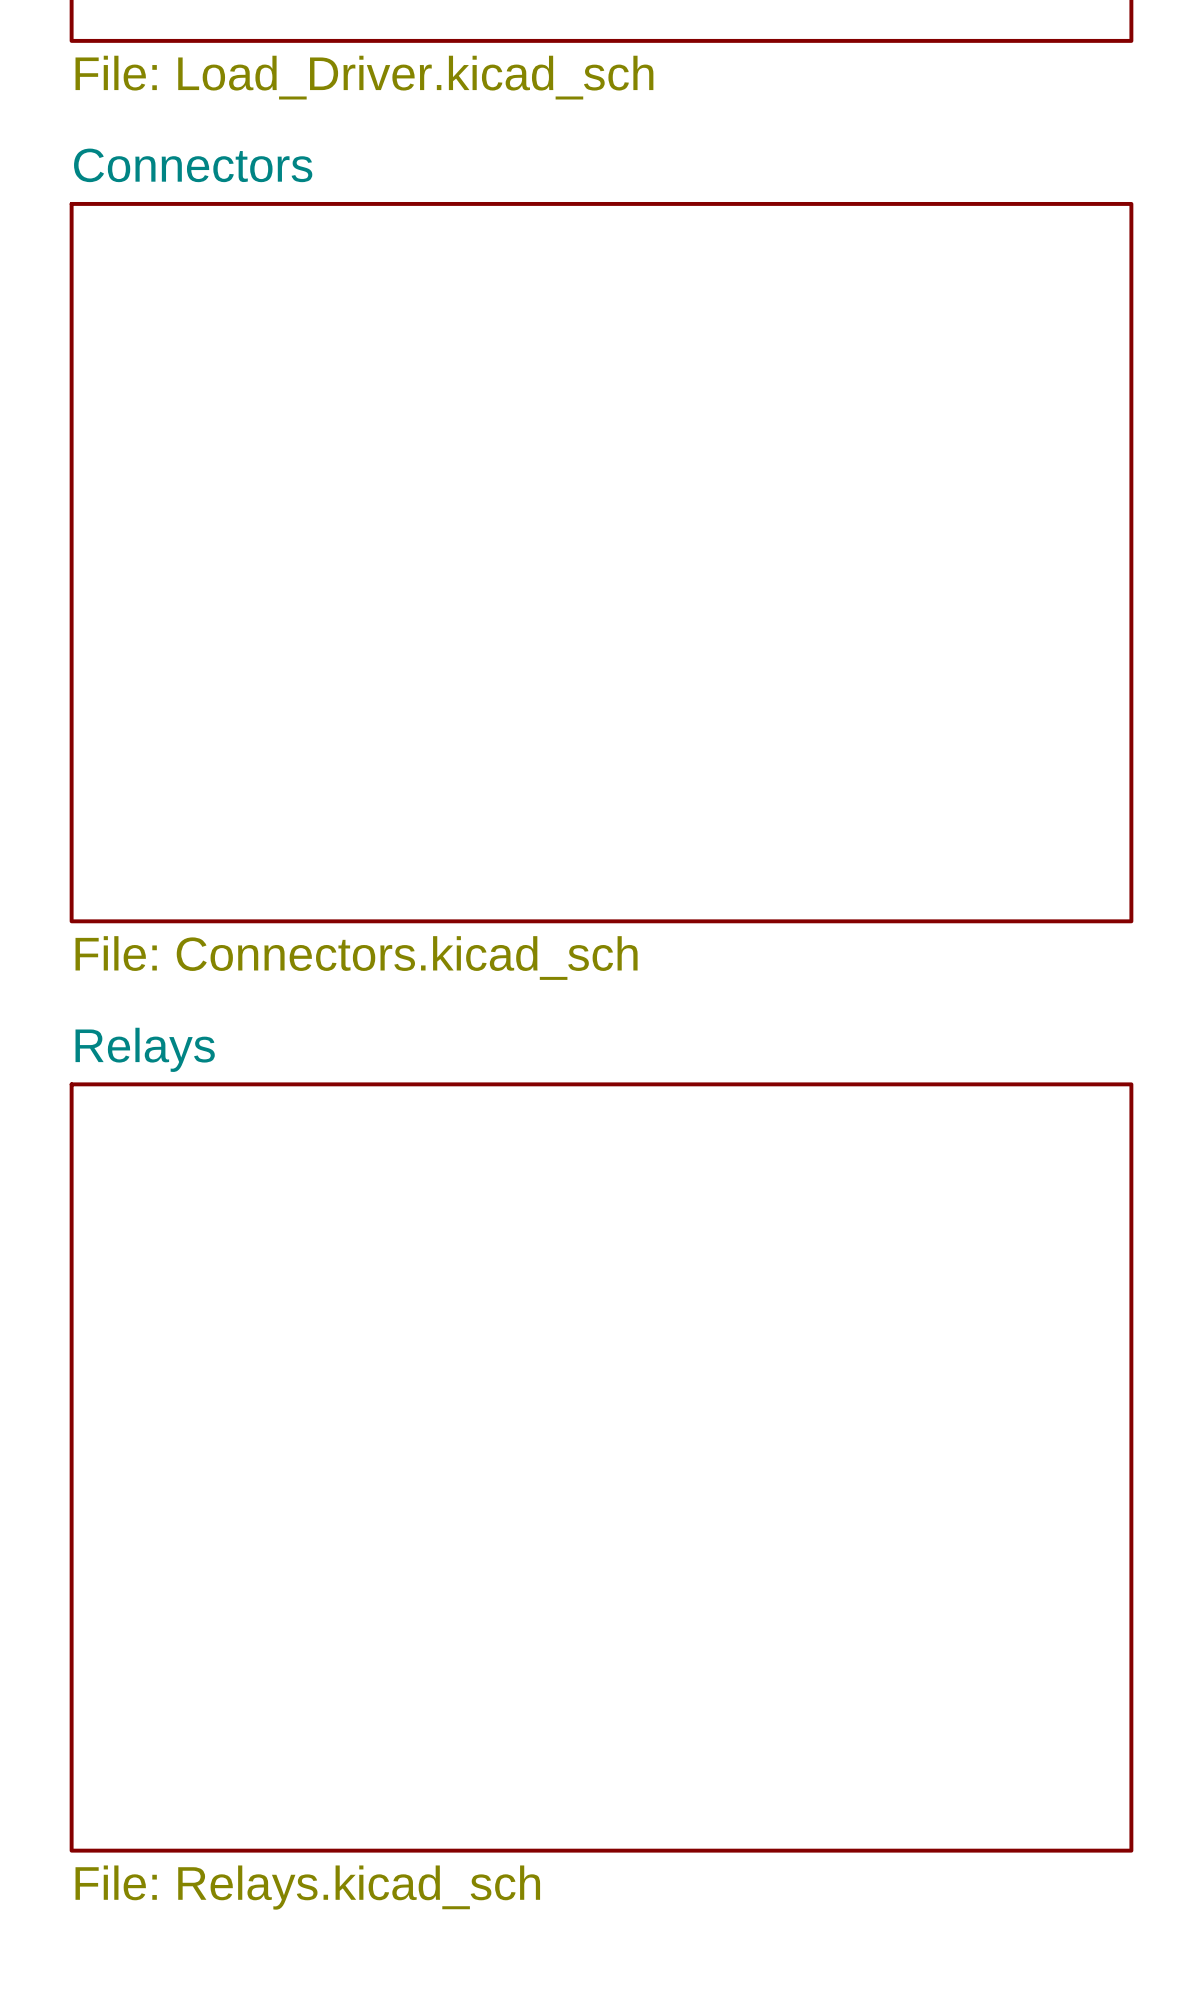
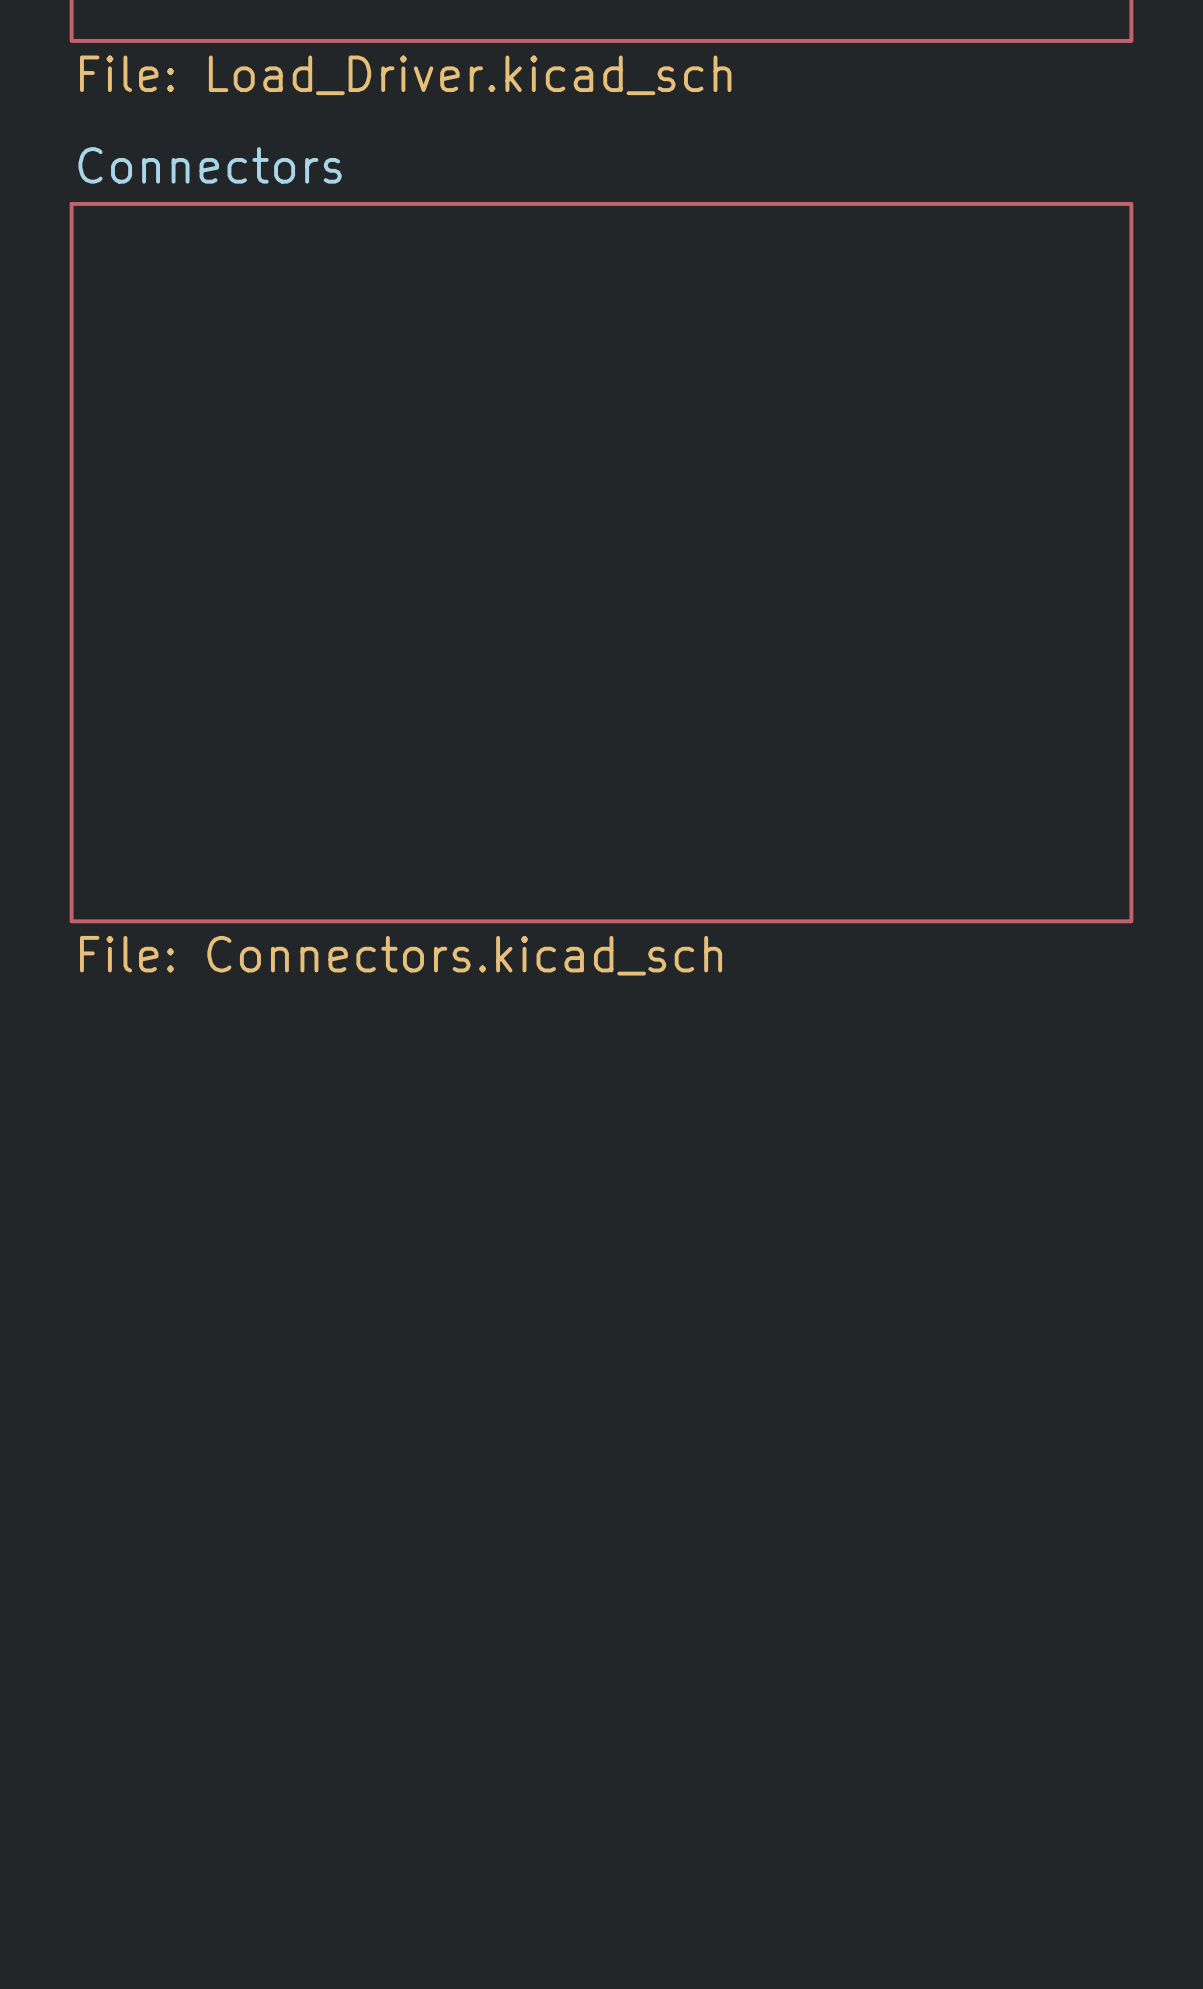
sheet Relays: File: Relays.kicad_sch (601, 1467) -> none

